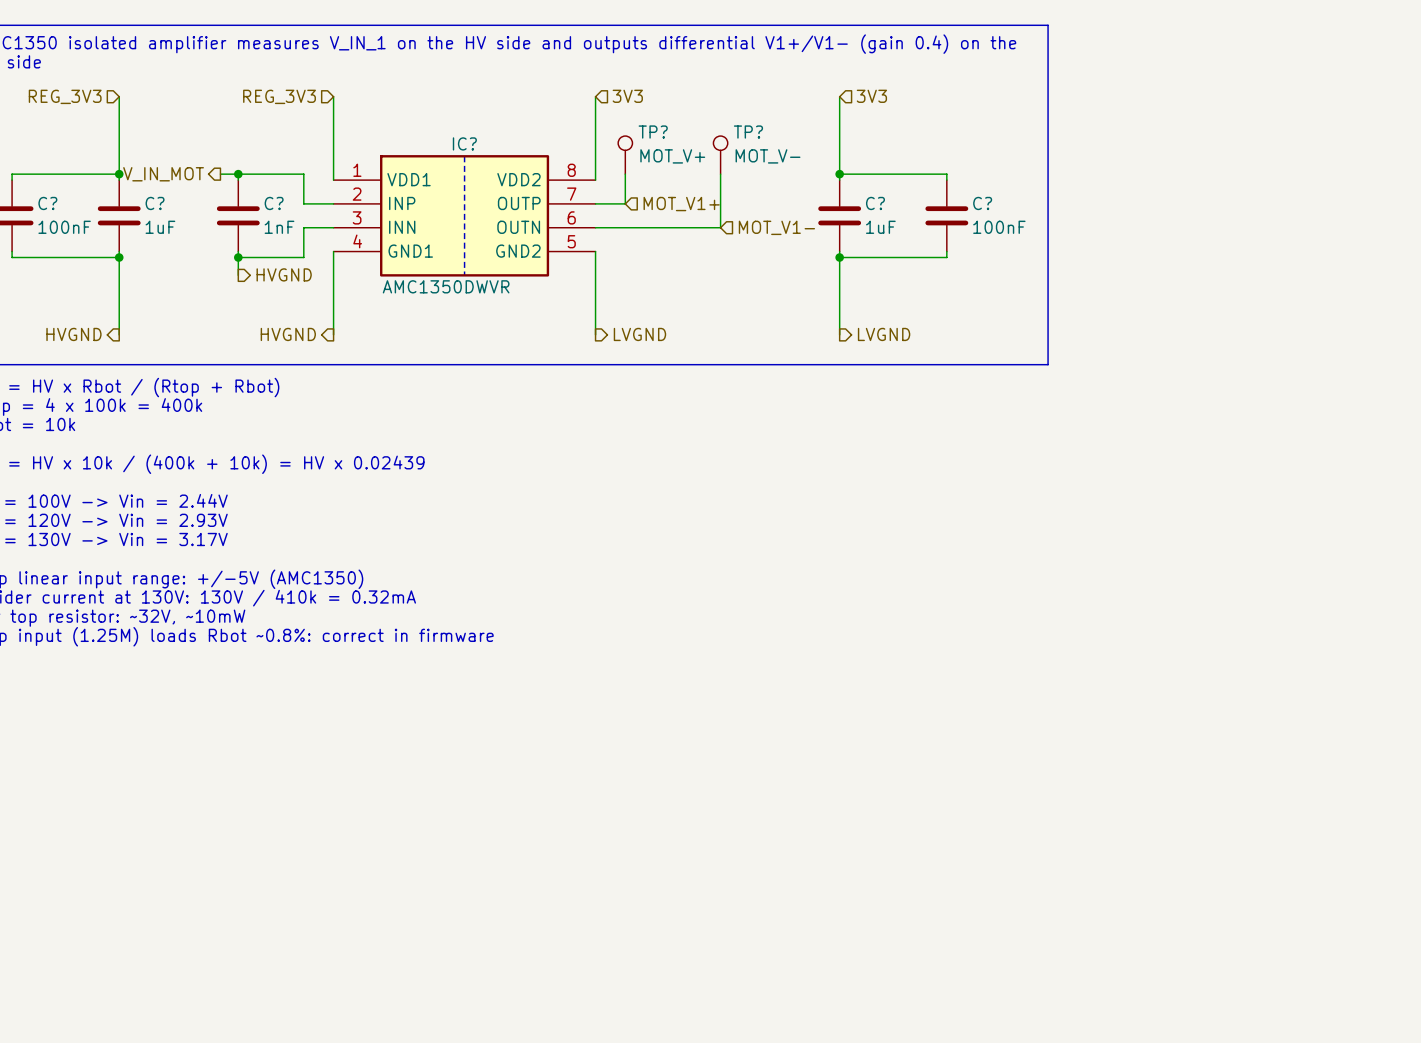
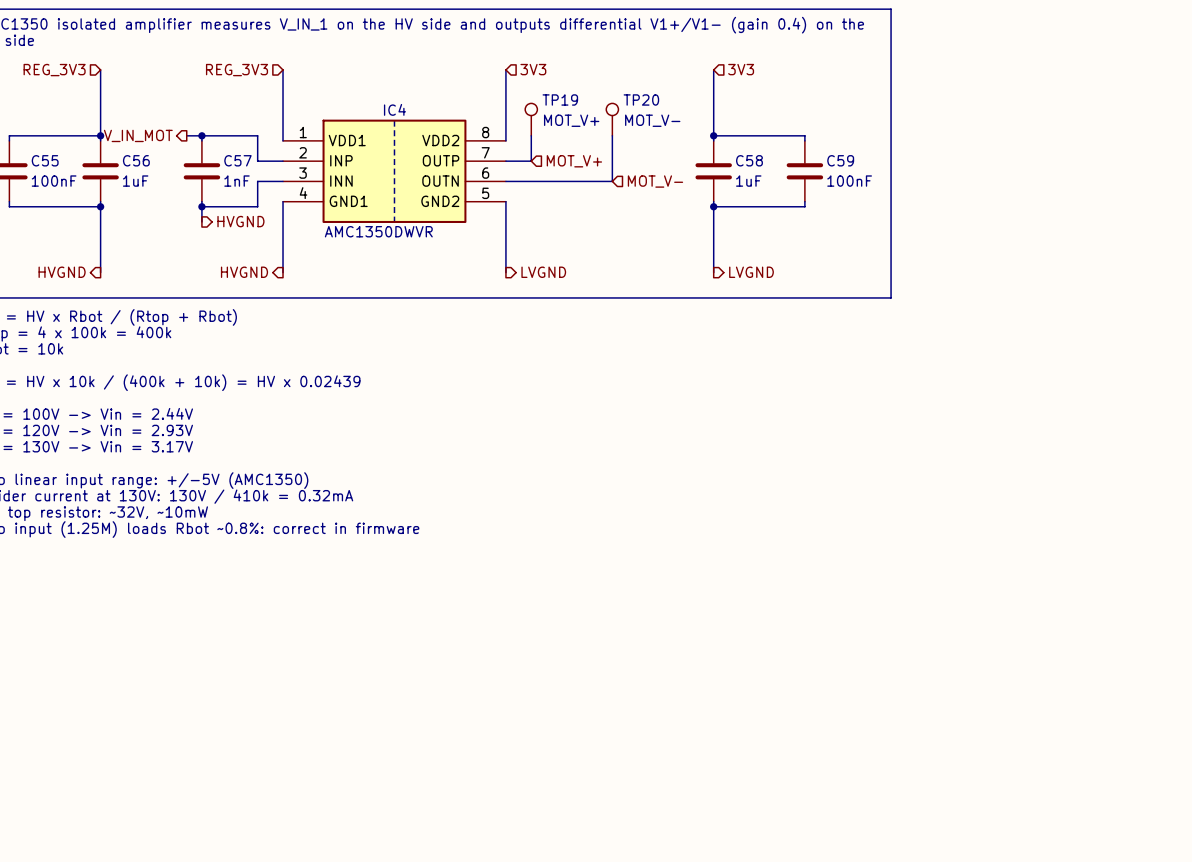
TP? name: TP? (653, 132) -> TP19 (560, 99)
TP? name: TP? (748, 132) -> TP20 (641, 99)
IC? name: IC? (464, 143) -> IC4 (394, 109)
C? name: C? (47, 203) -> C55 (45, 160)
C? name: C? (155, 203) -> C56 (136, 160)
C? name: C? (274, 203) -> C57 (237, 160)
C? name: C? (875, 203) -> C58 (749, 160)
C? name: C? (982, 203) -> C59 (840, 160)
hierarchical label: MOT_V1+ (681, 204) -> MOT_V+ (574, 161)
hierarchical label: MOT_V1- (776, 227) -> MOT_V- (655, 181)

